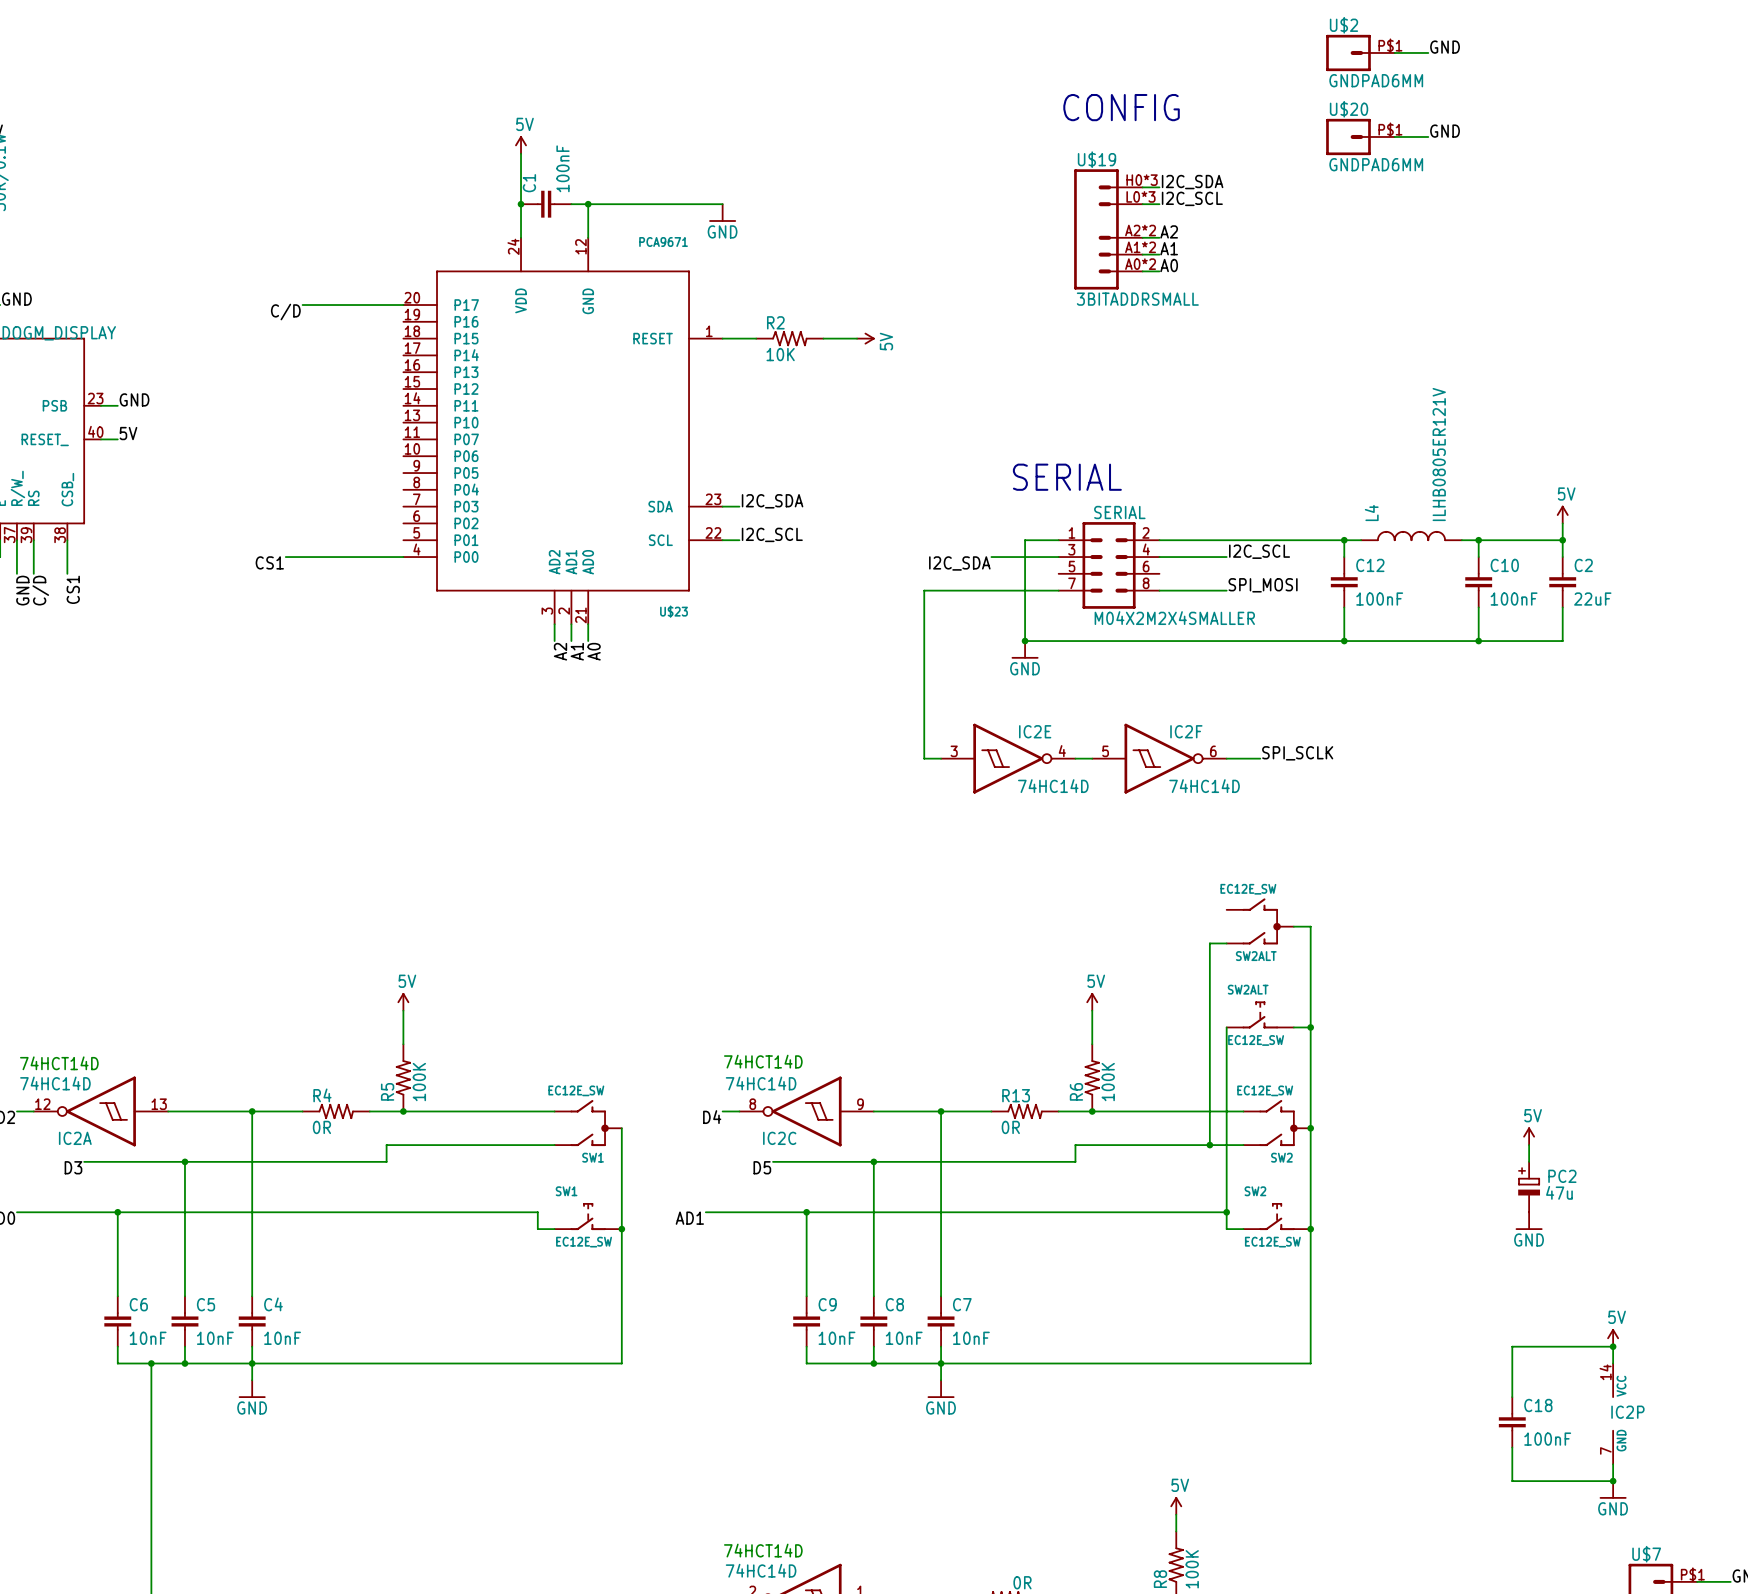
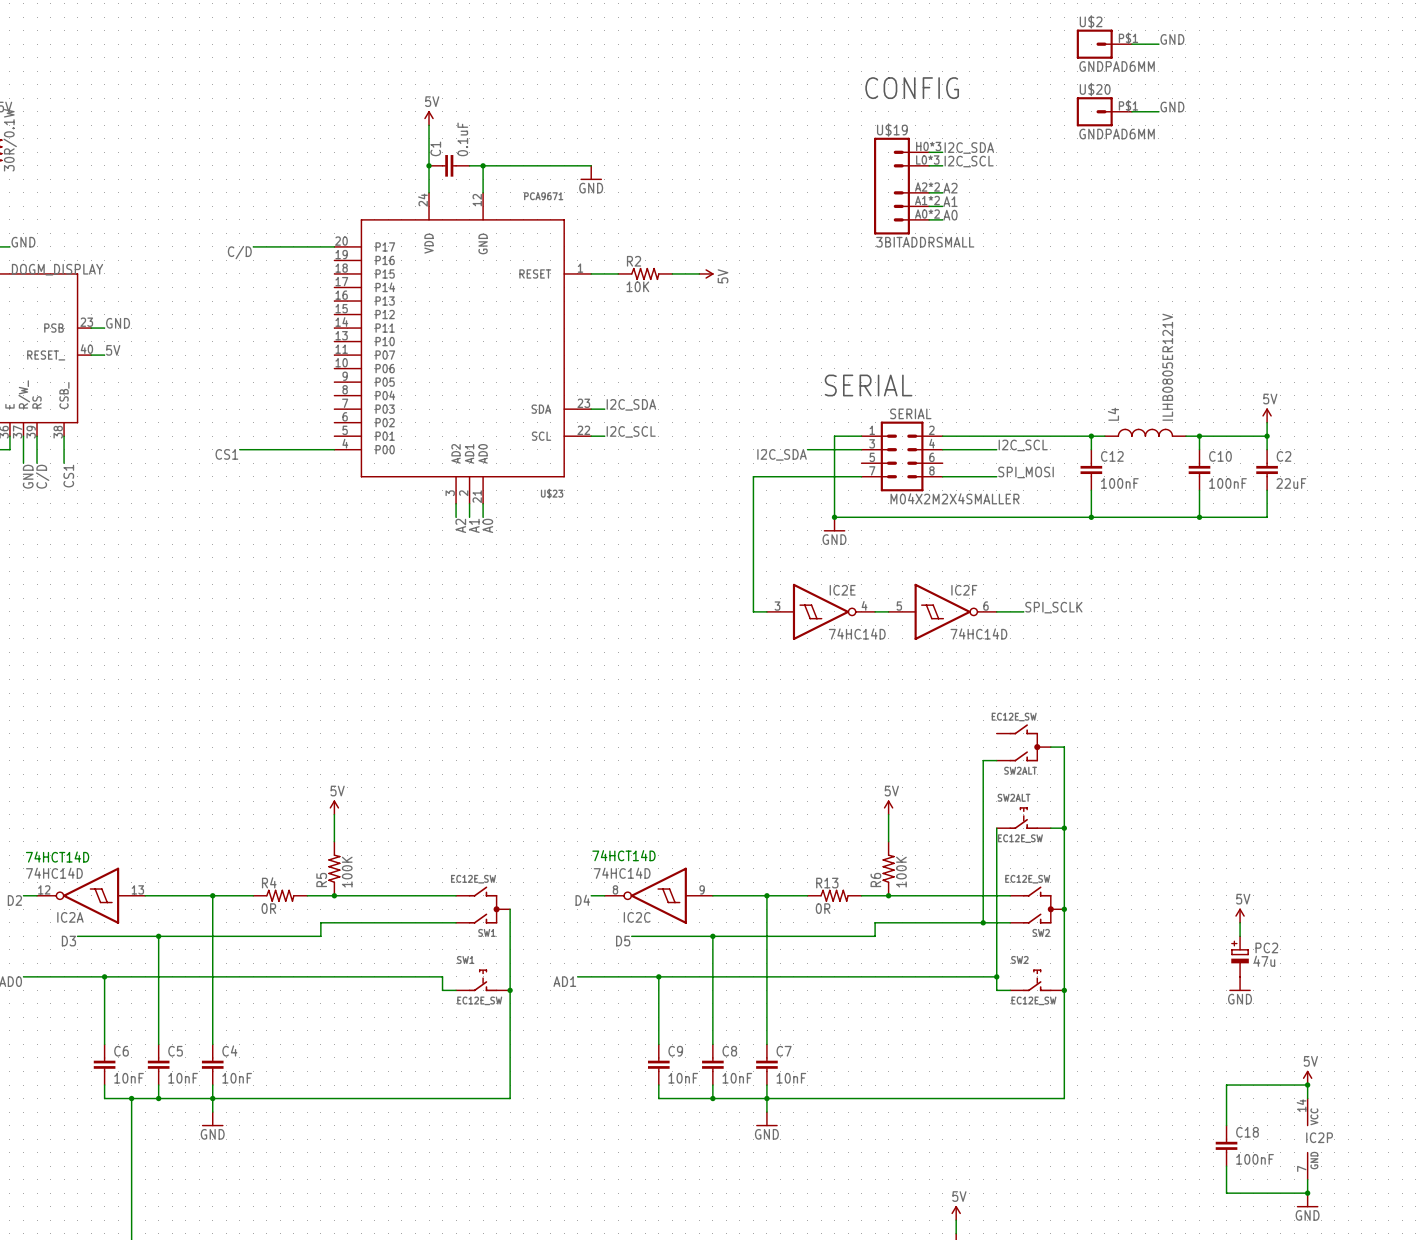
C1 value: 100nF (563, 168) -> 0.1uF (462, 139)

